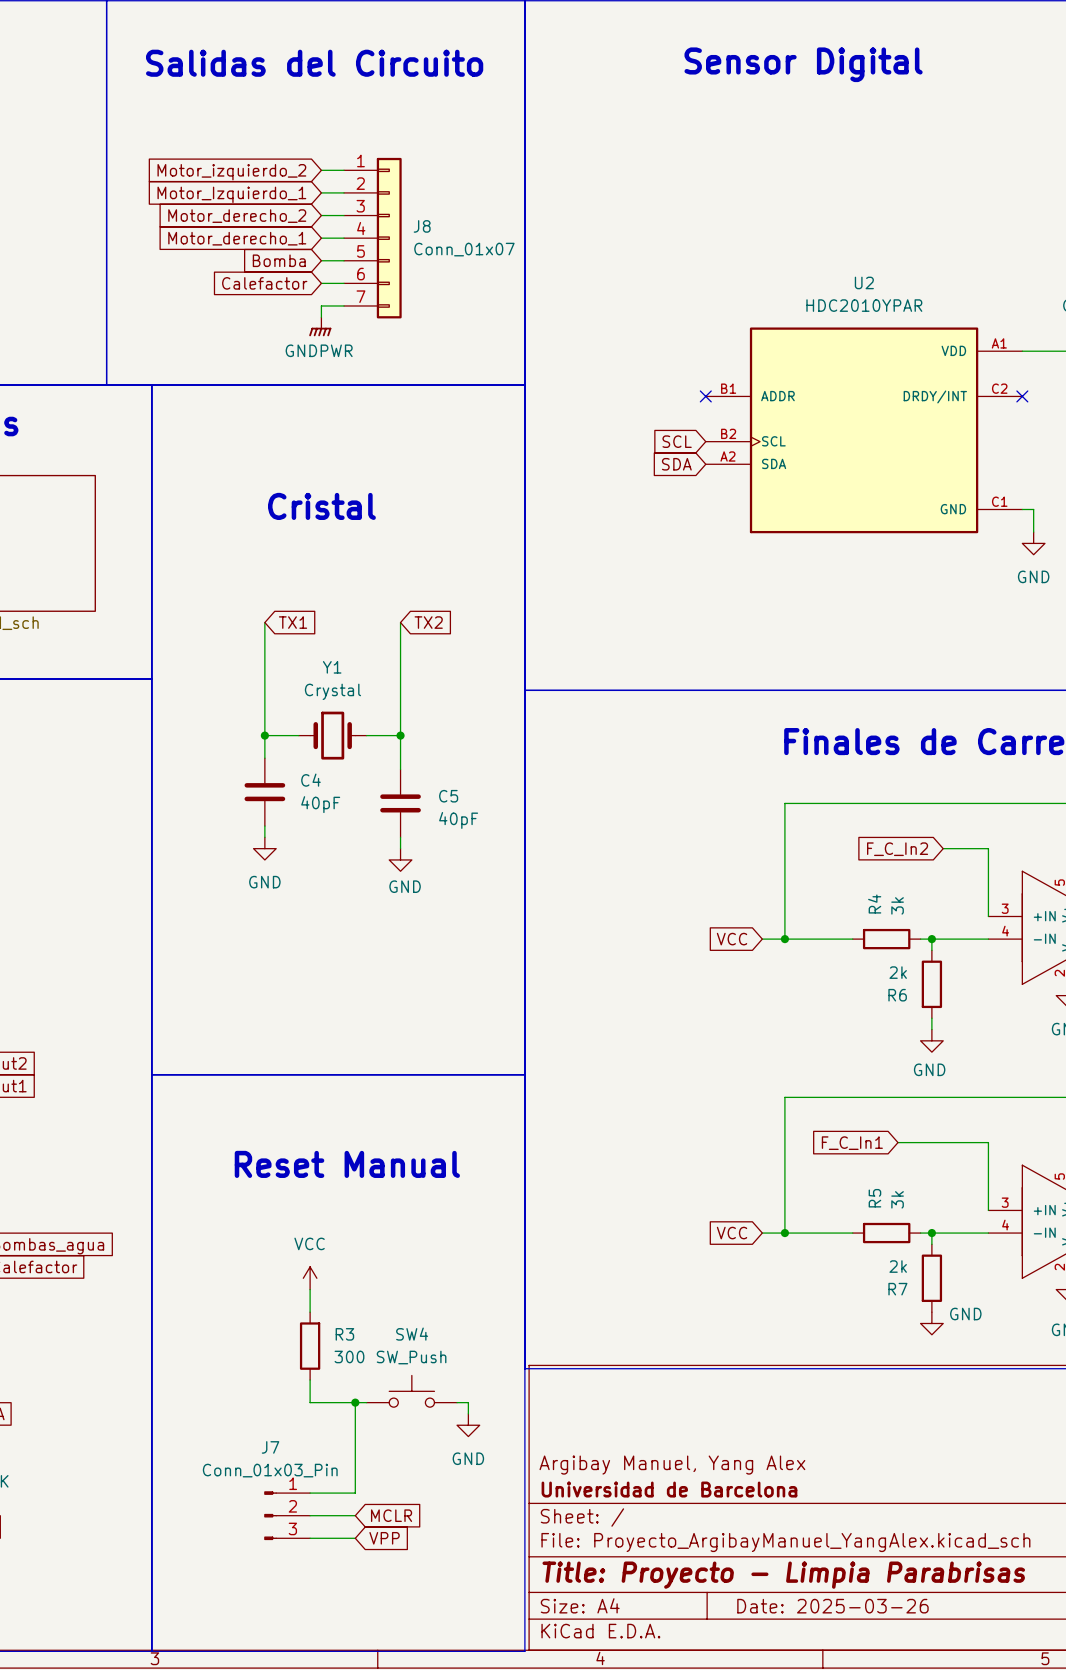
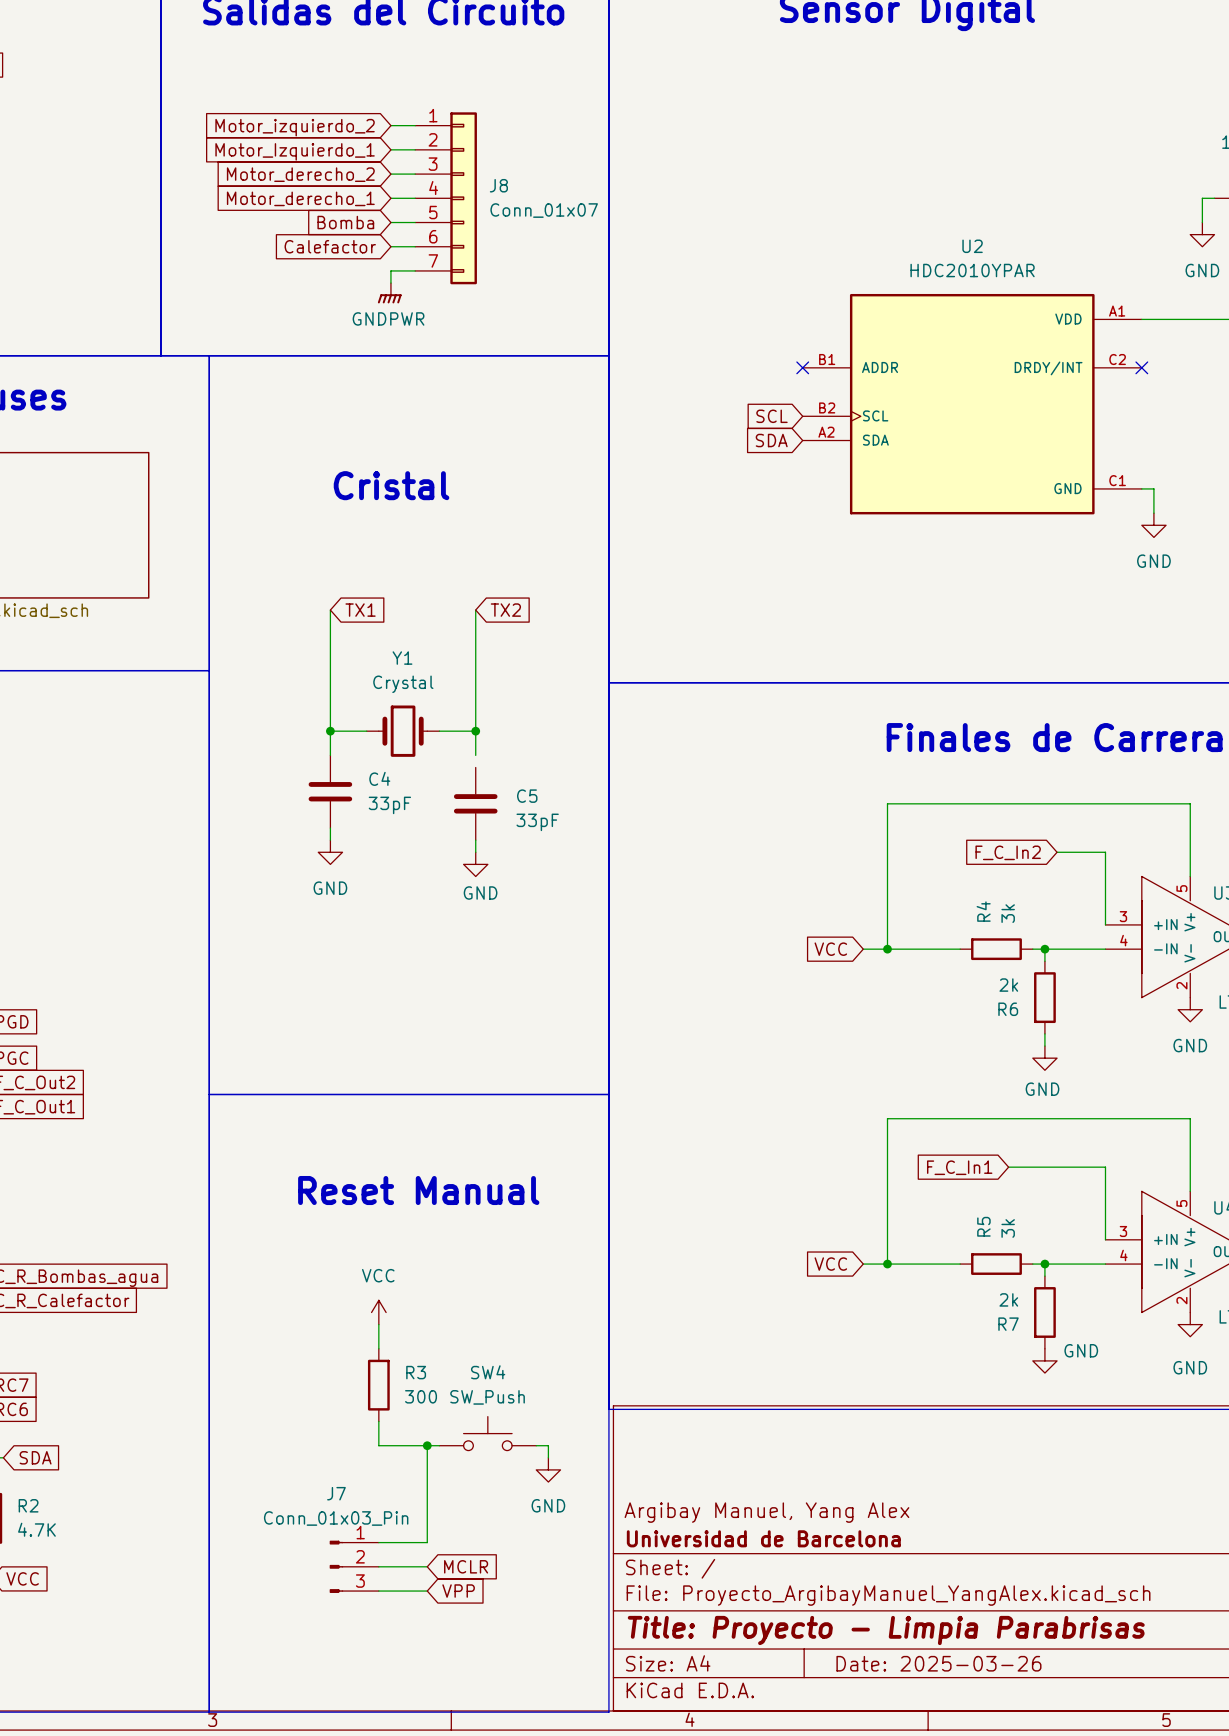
wire: (400, 758) (400, 769) -> none
C4 value: 40pF (320, 804) -> 33pF (389, 805)
C5 value: 40pF (458, 820) -> 33pF (537, 822)

